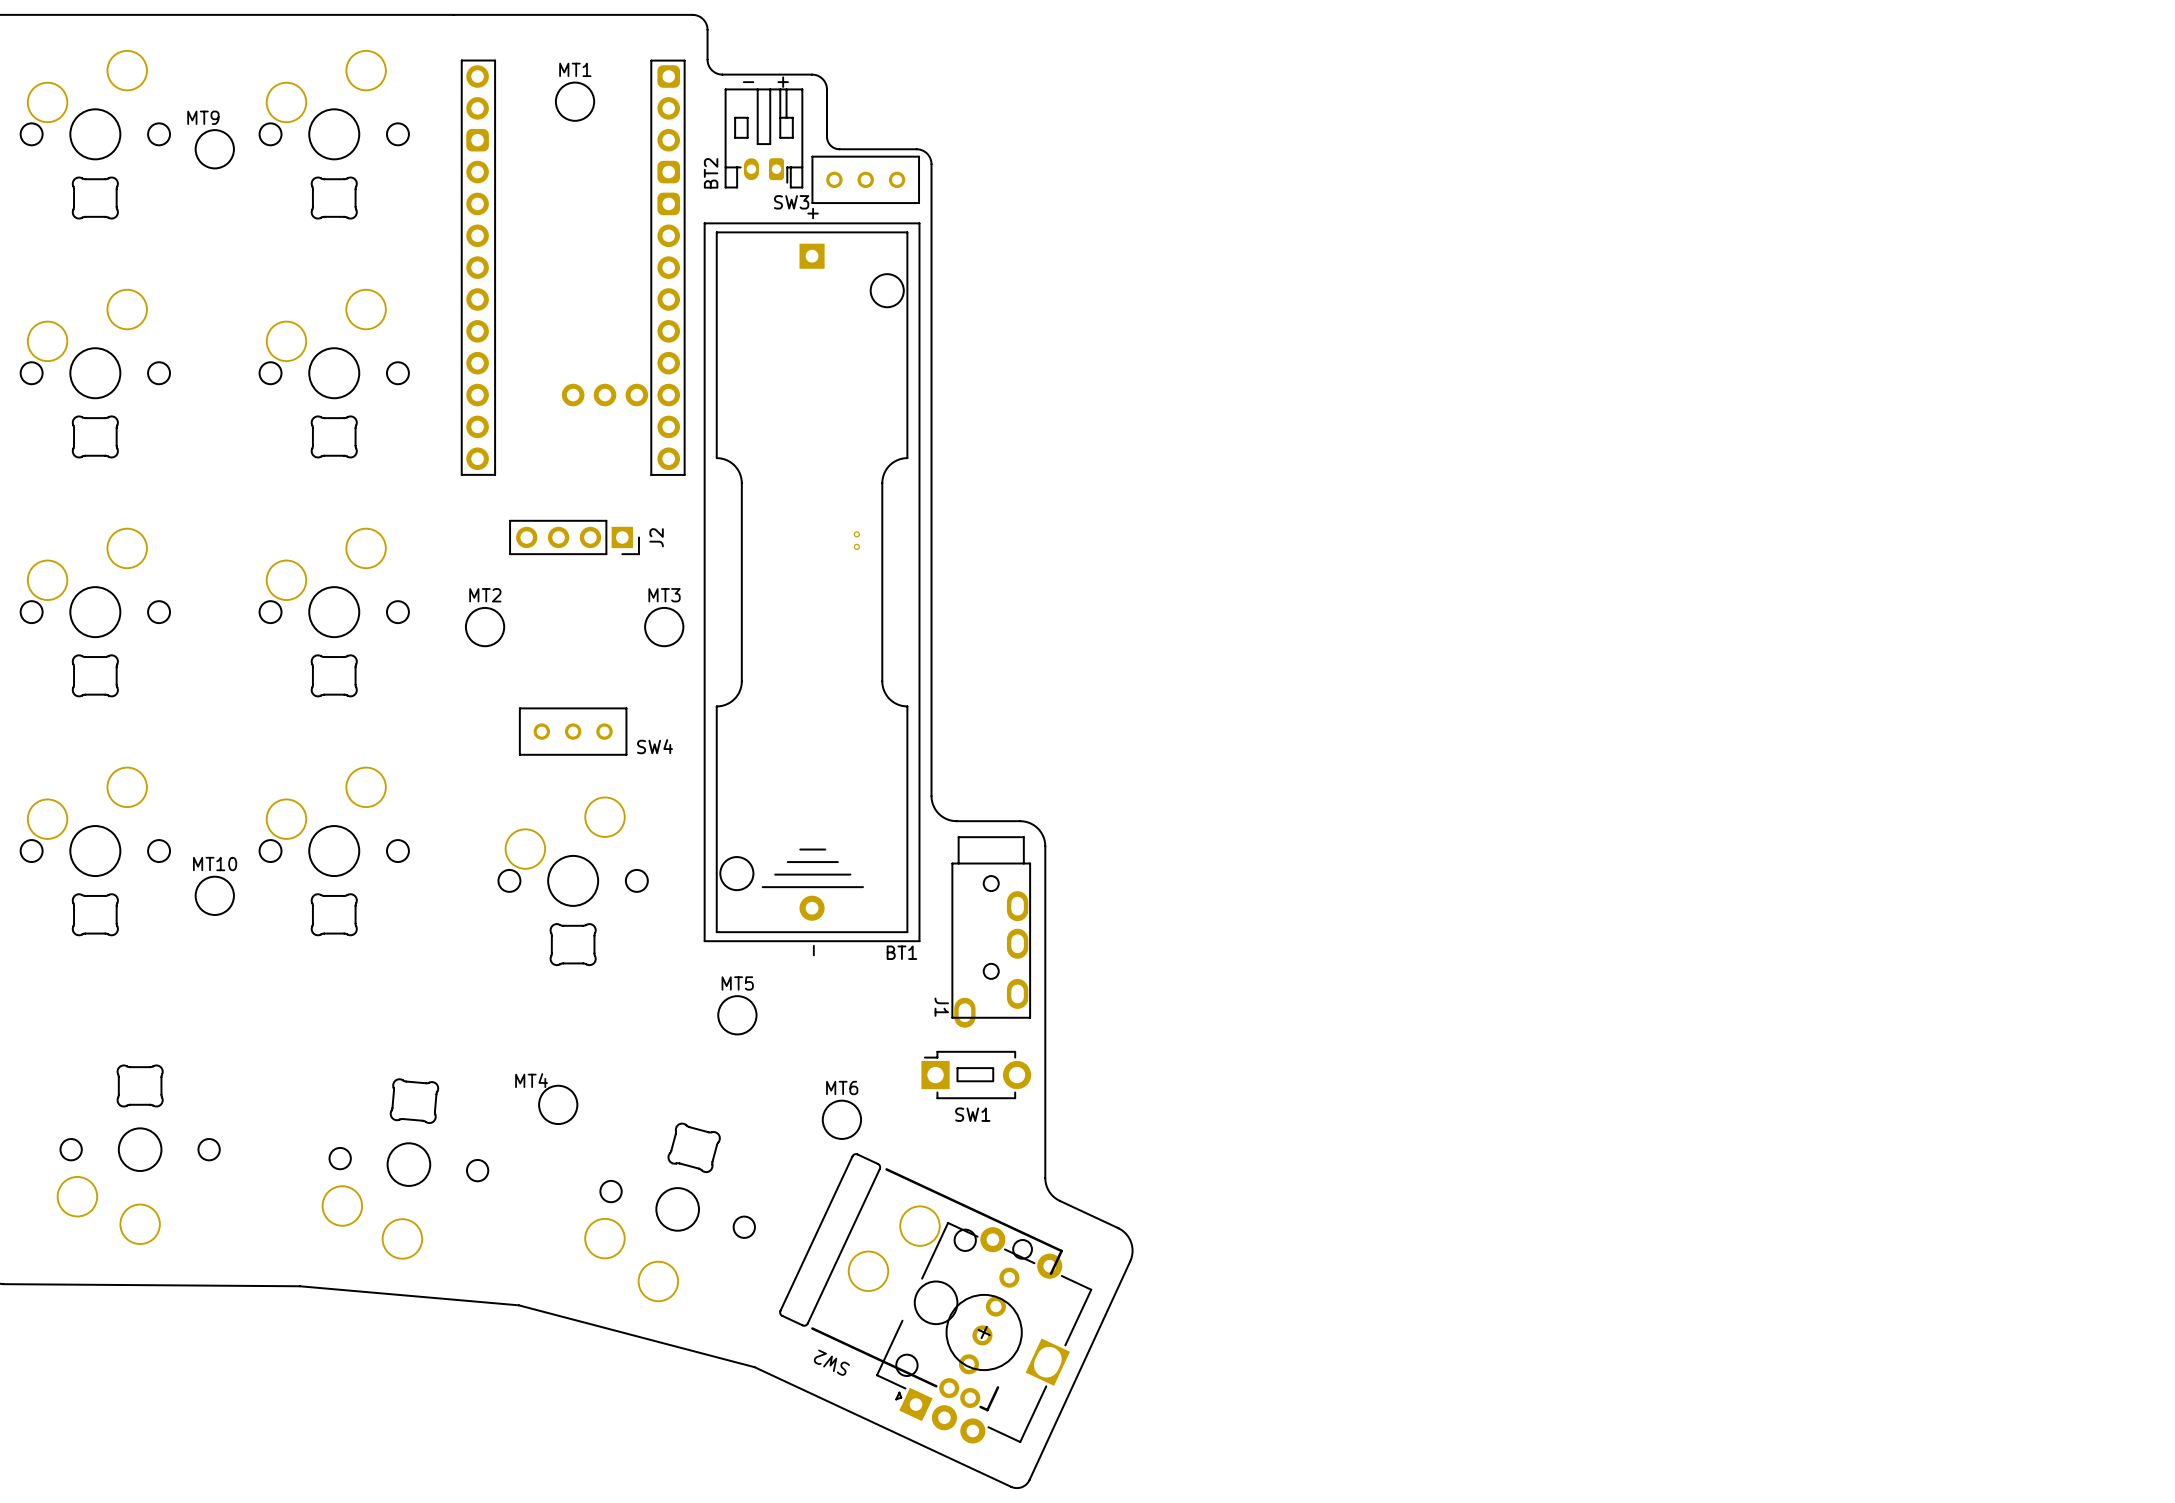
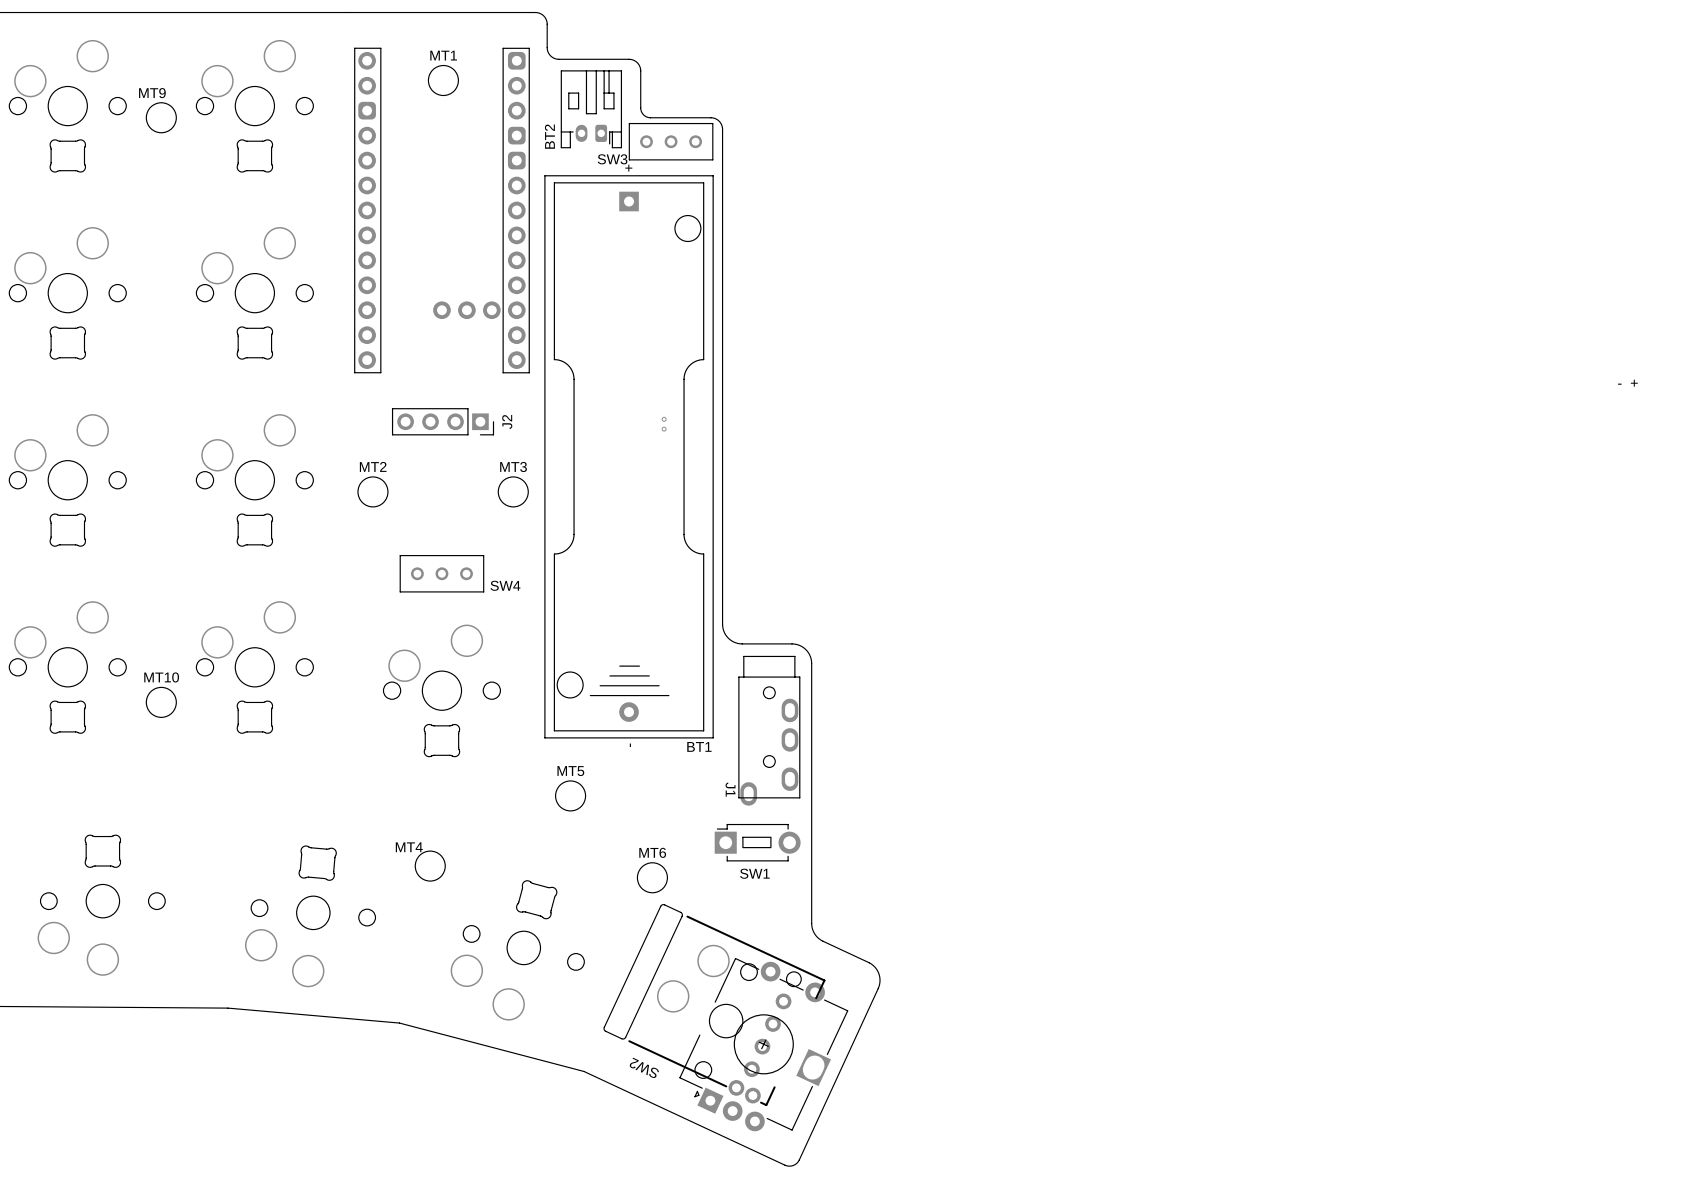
text: - + (765, 82) -> none
text: none -> - + (1627, 383)

